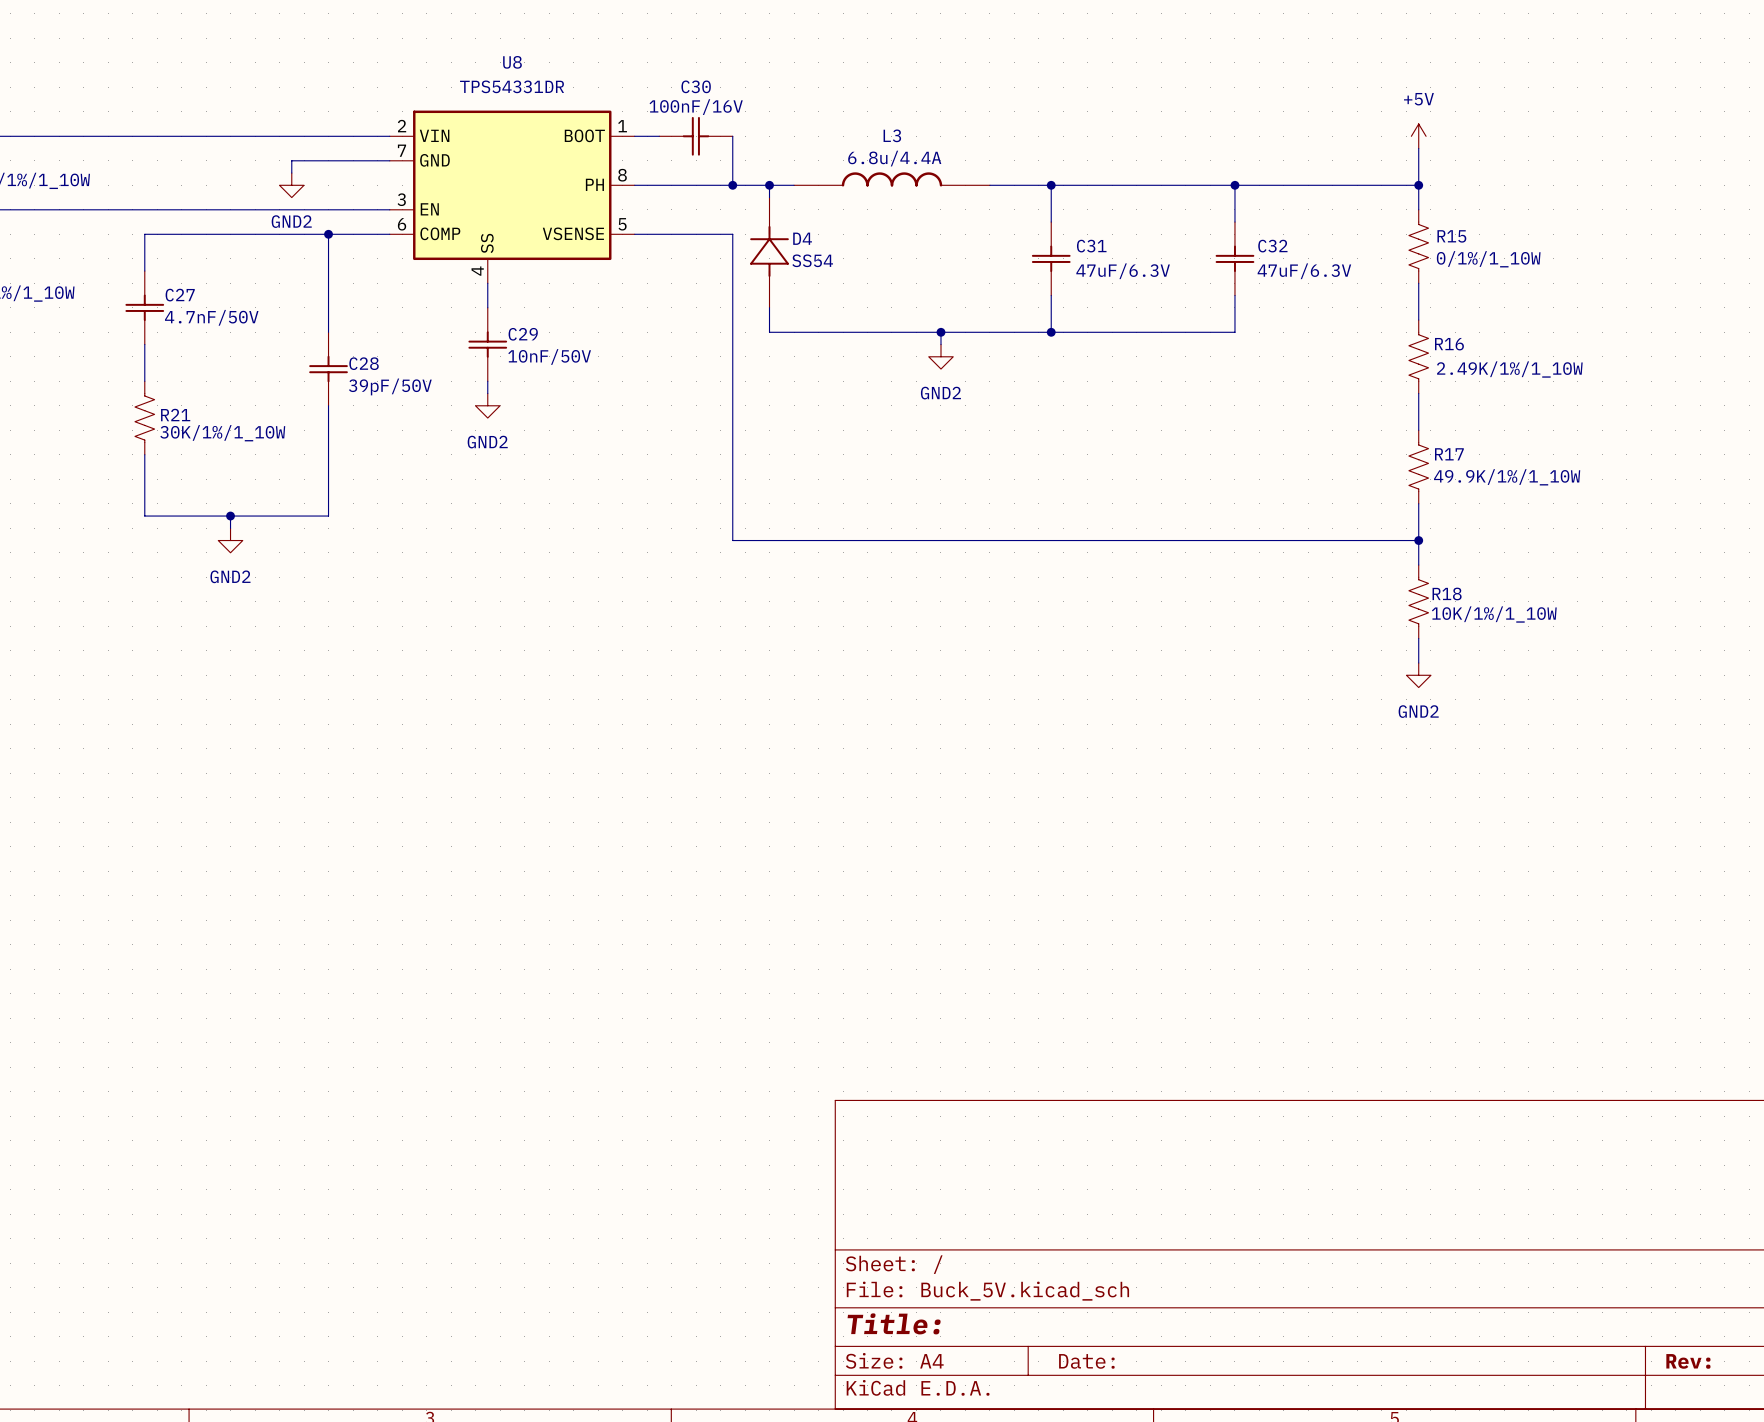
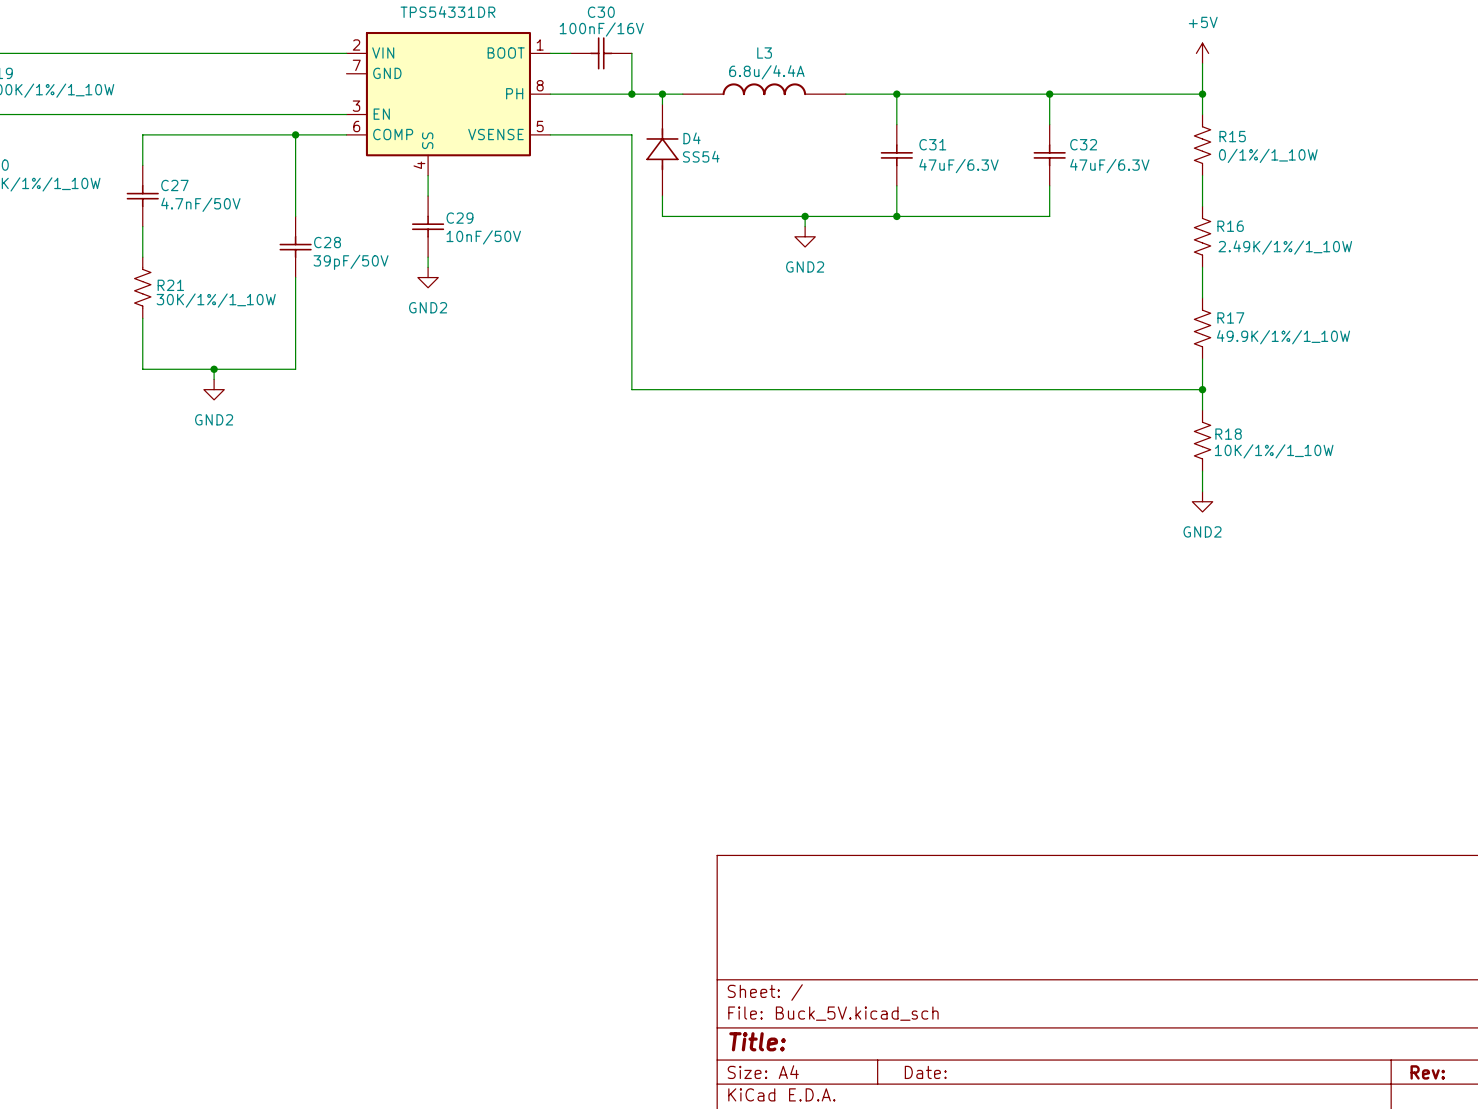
wire: (389, 160) (291, 160) (291, 173) -> none
power symbol: GND2 (291, 185) -> none

